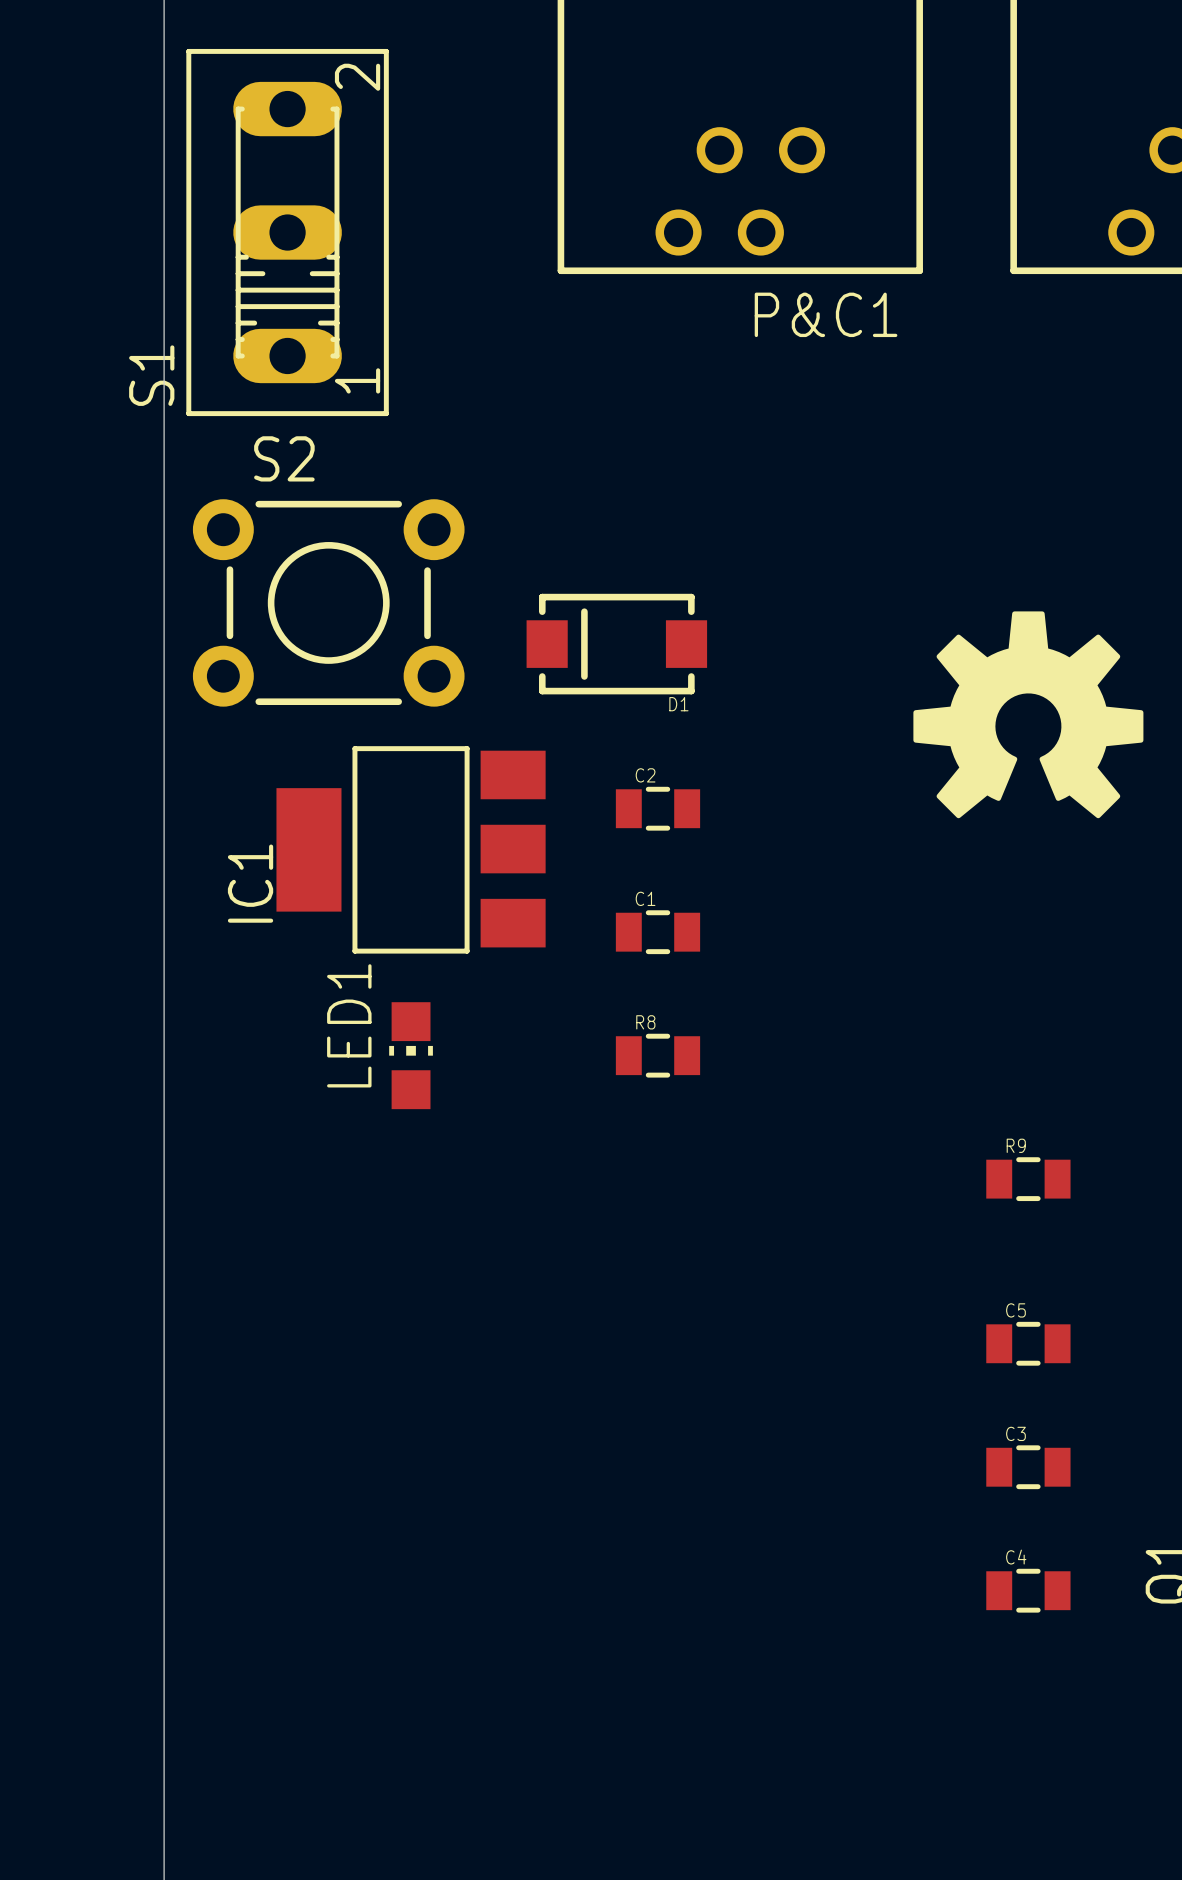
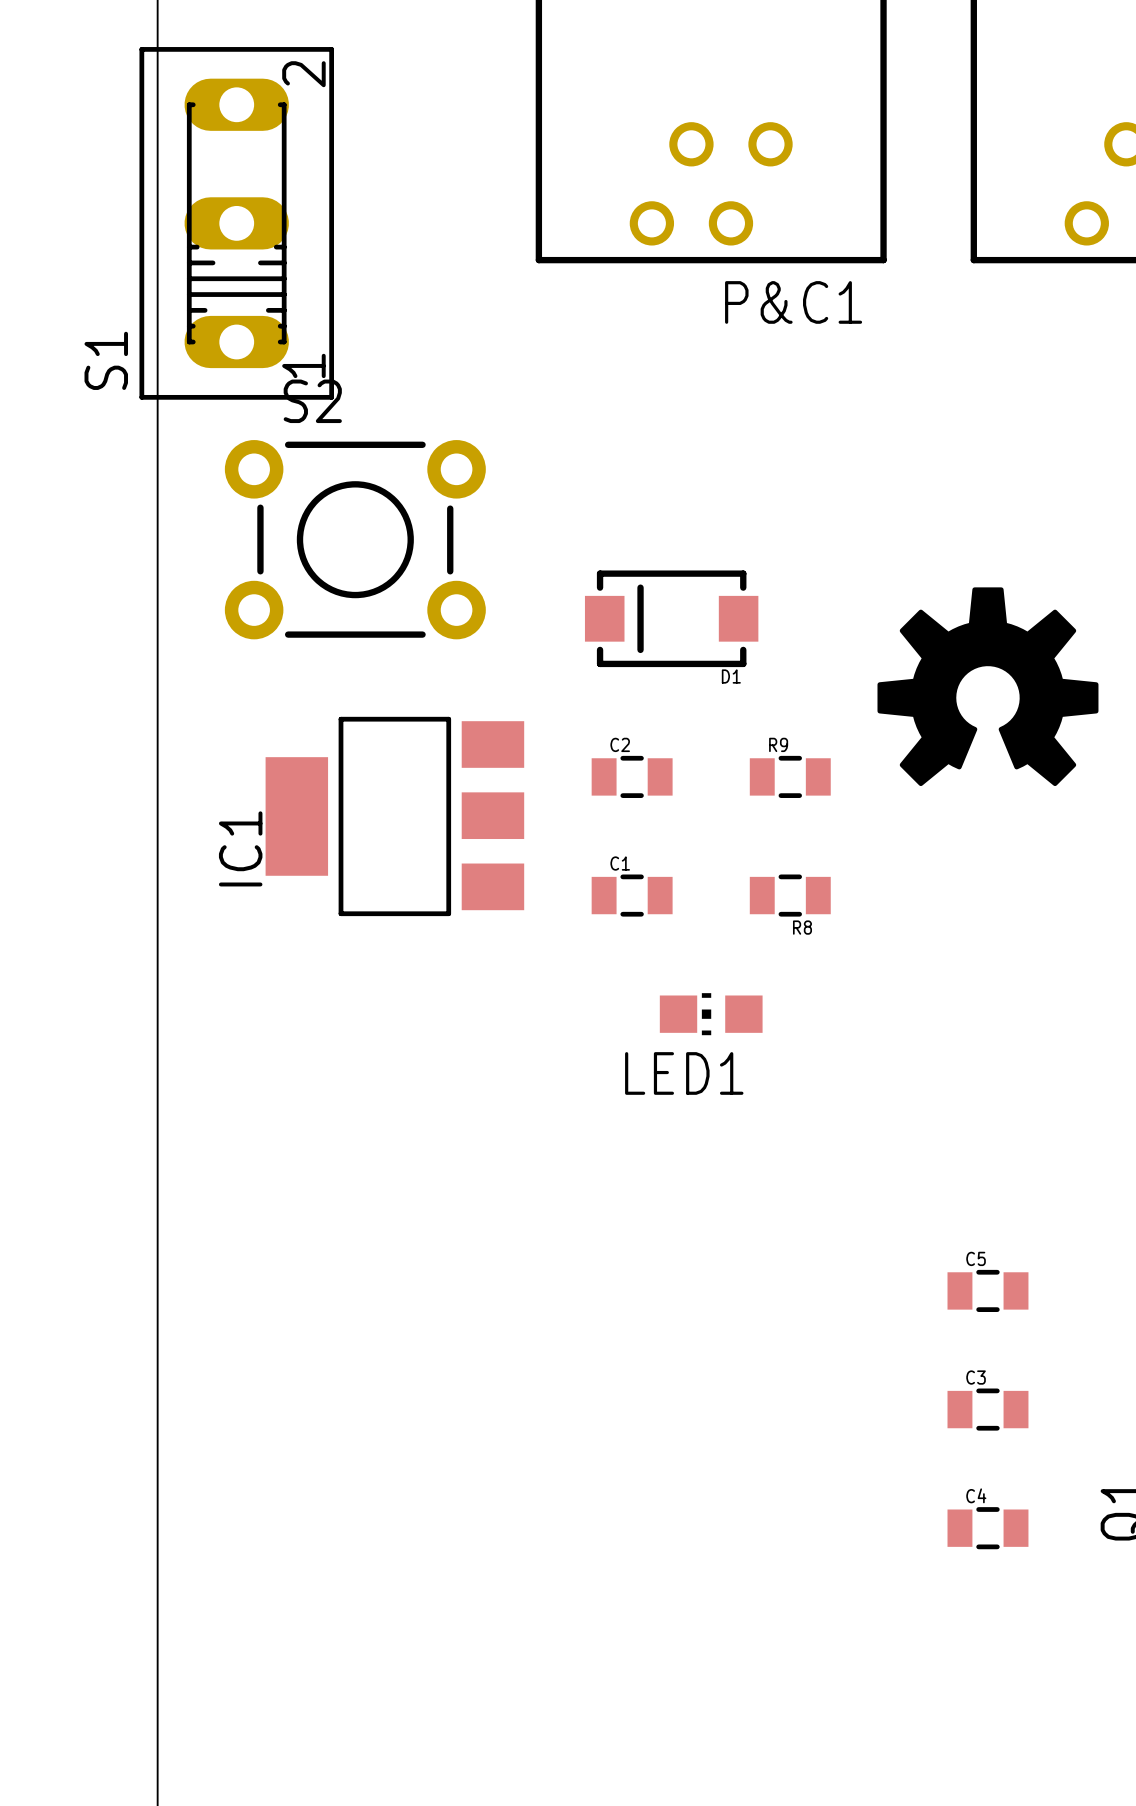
S1 position: (287, 232) -> (236, 223)
S2 position: (328, 602) -> (355, 539)
D1 position: (616, 644) -> (671, 618)
R8 name position: R8 (645, 1022) -> R8 (802, 927)
LED1 rotation: 0° (411, 1055) -> 90° counterclockwise (711, 1014)
LED1 position: (411, 1055) -> (711, 1014)
R8 position: (657, 1055) -> (790, 895)
R9 position: (1028, 1179) -> (790, 776)

